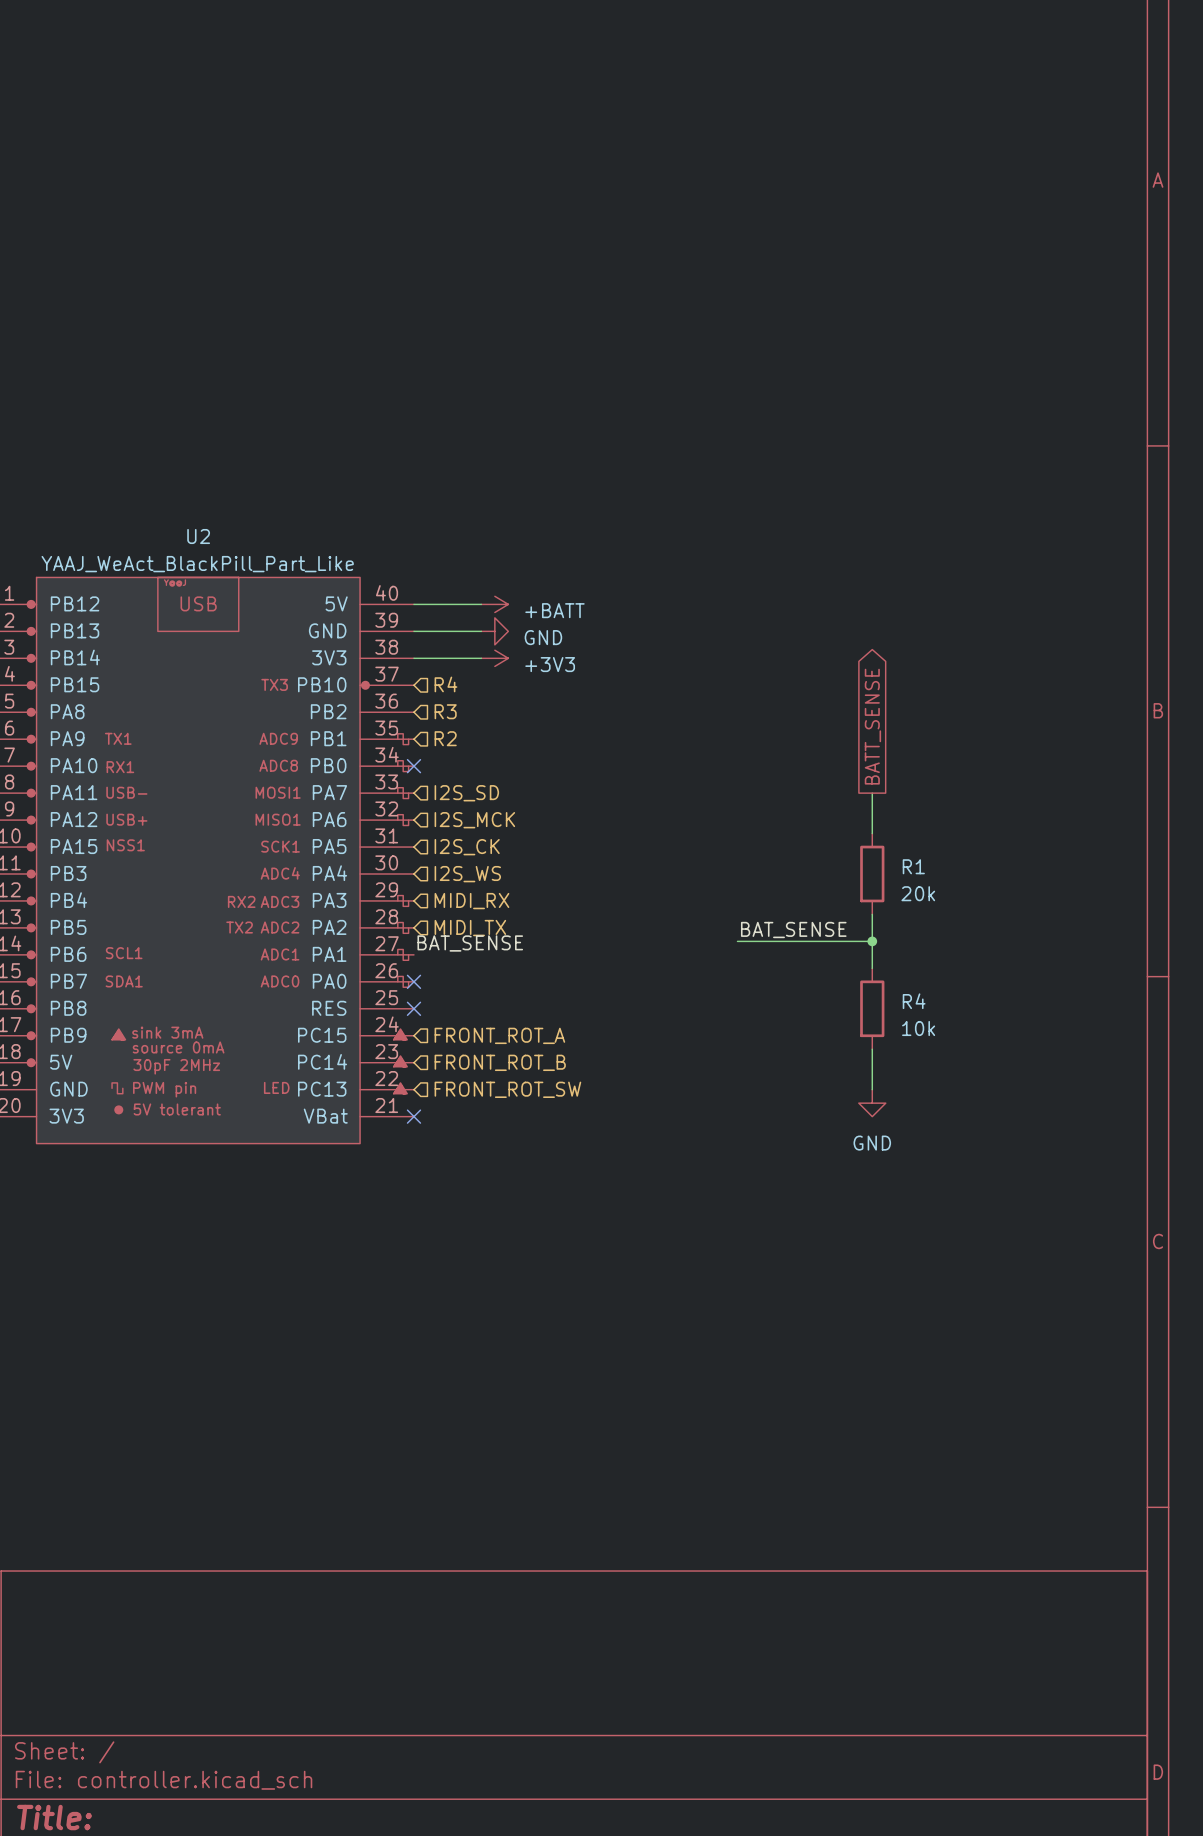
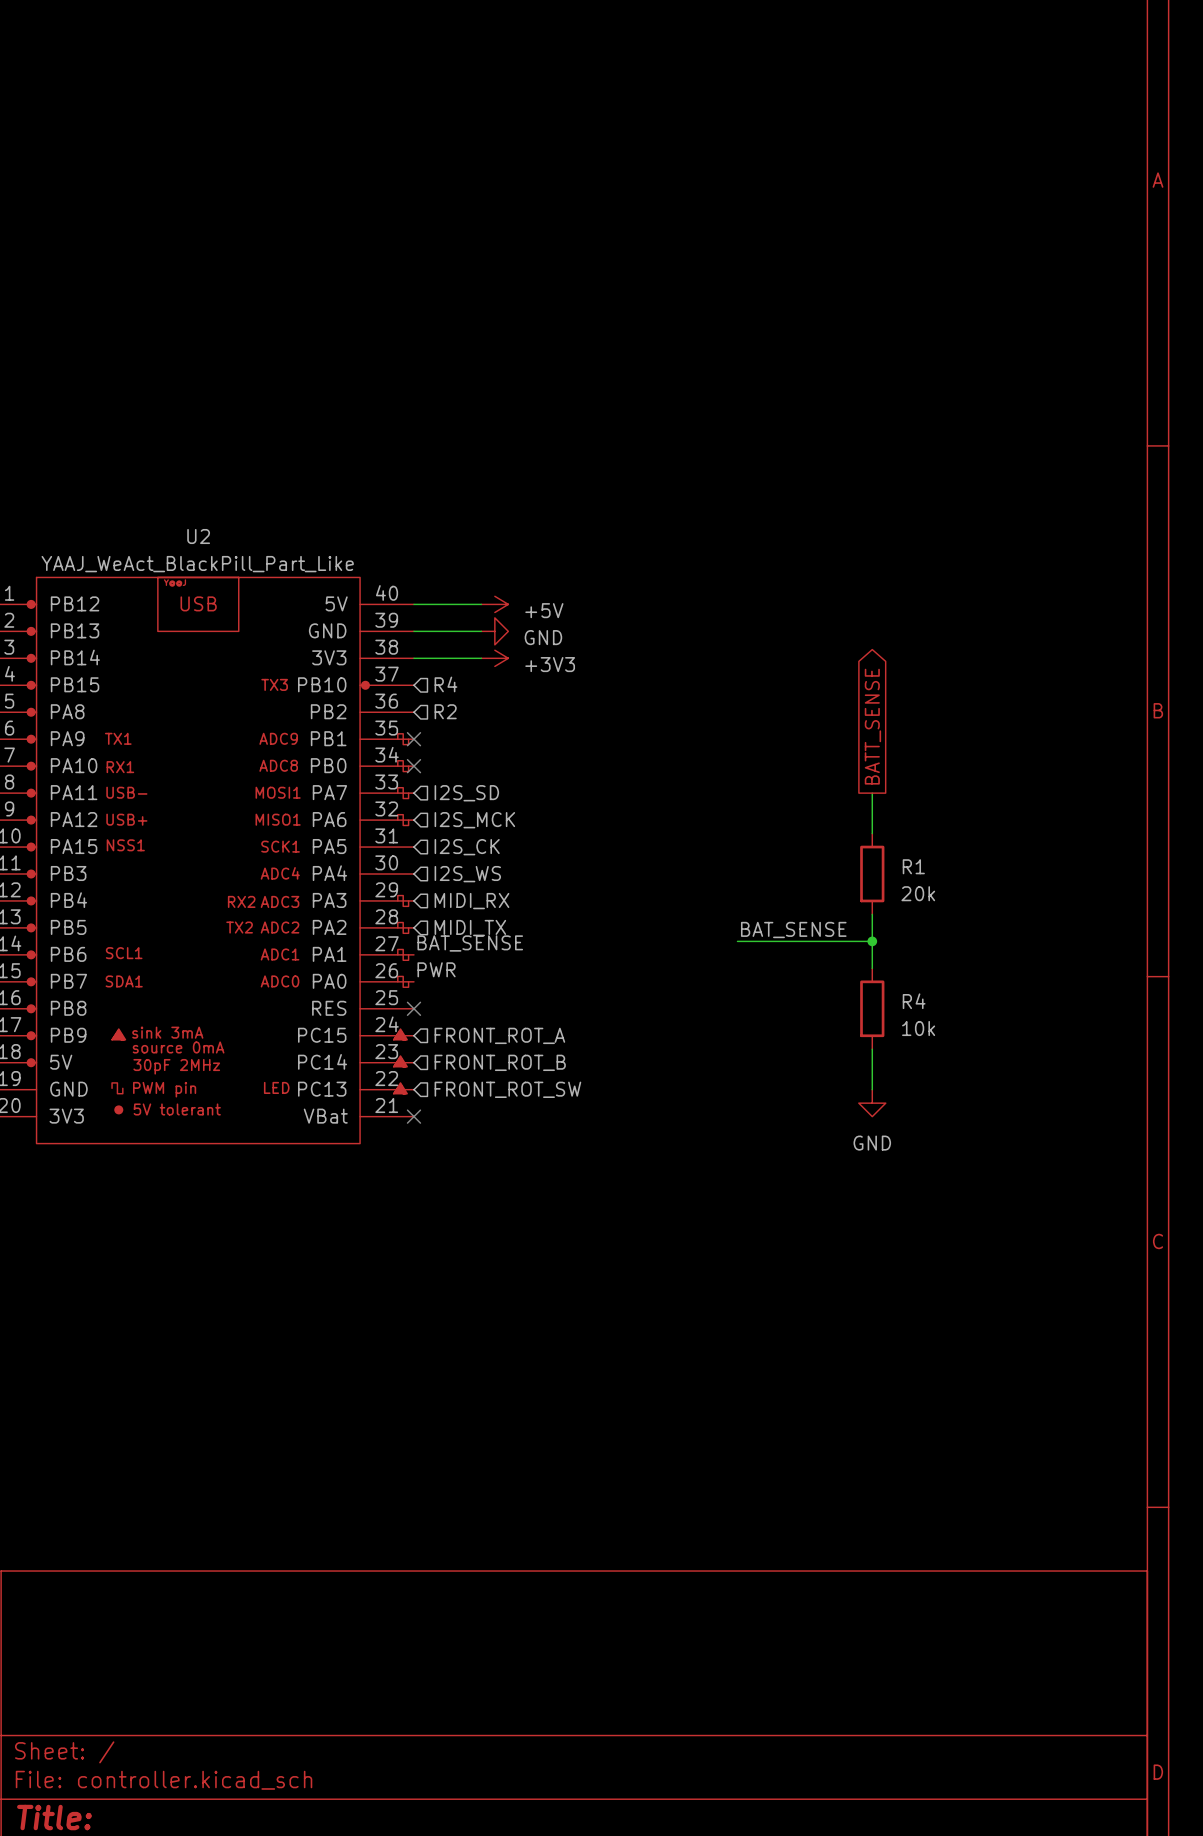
power symbol: +BATT (494, 604) -> +5V (494, 604)
hierarchical label: R3 (445, 711) -> R2 (445, 711)
hierarchical label: R2 (445, 738) -> none
no-connect mark: none -> (413, 739)
label: none -> PWR (436, 969)
no-connect mark: (413, 981) -> none

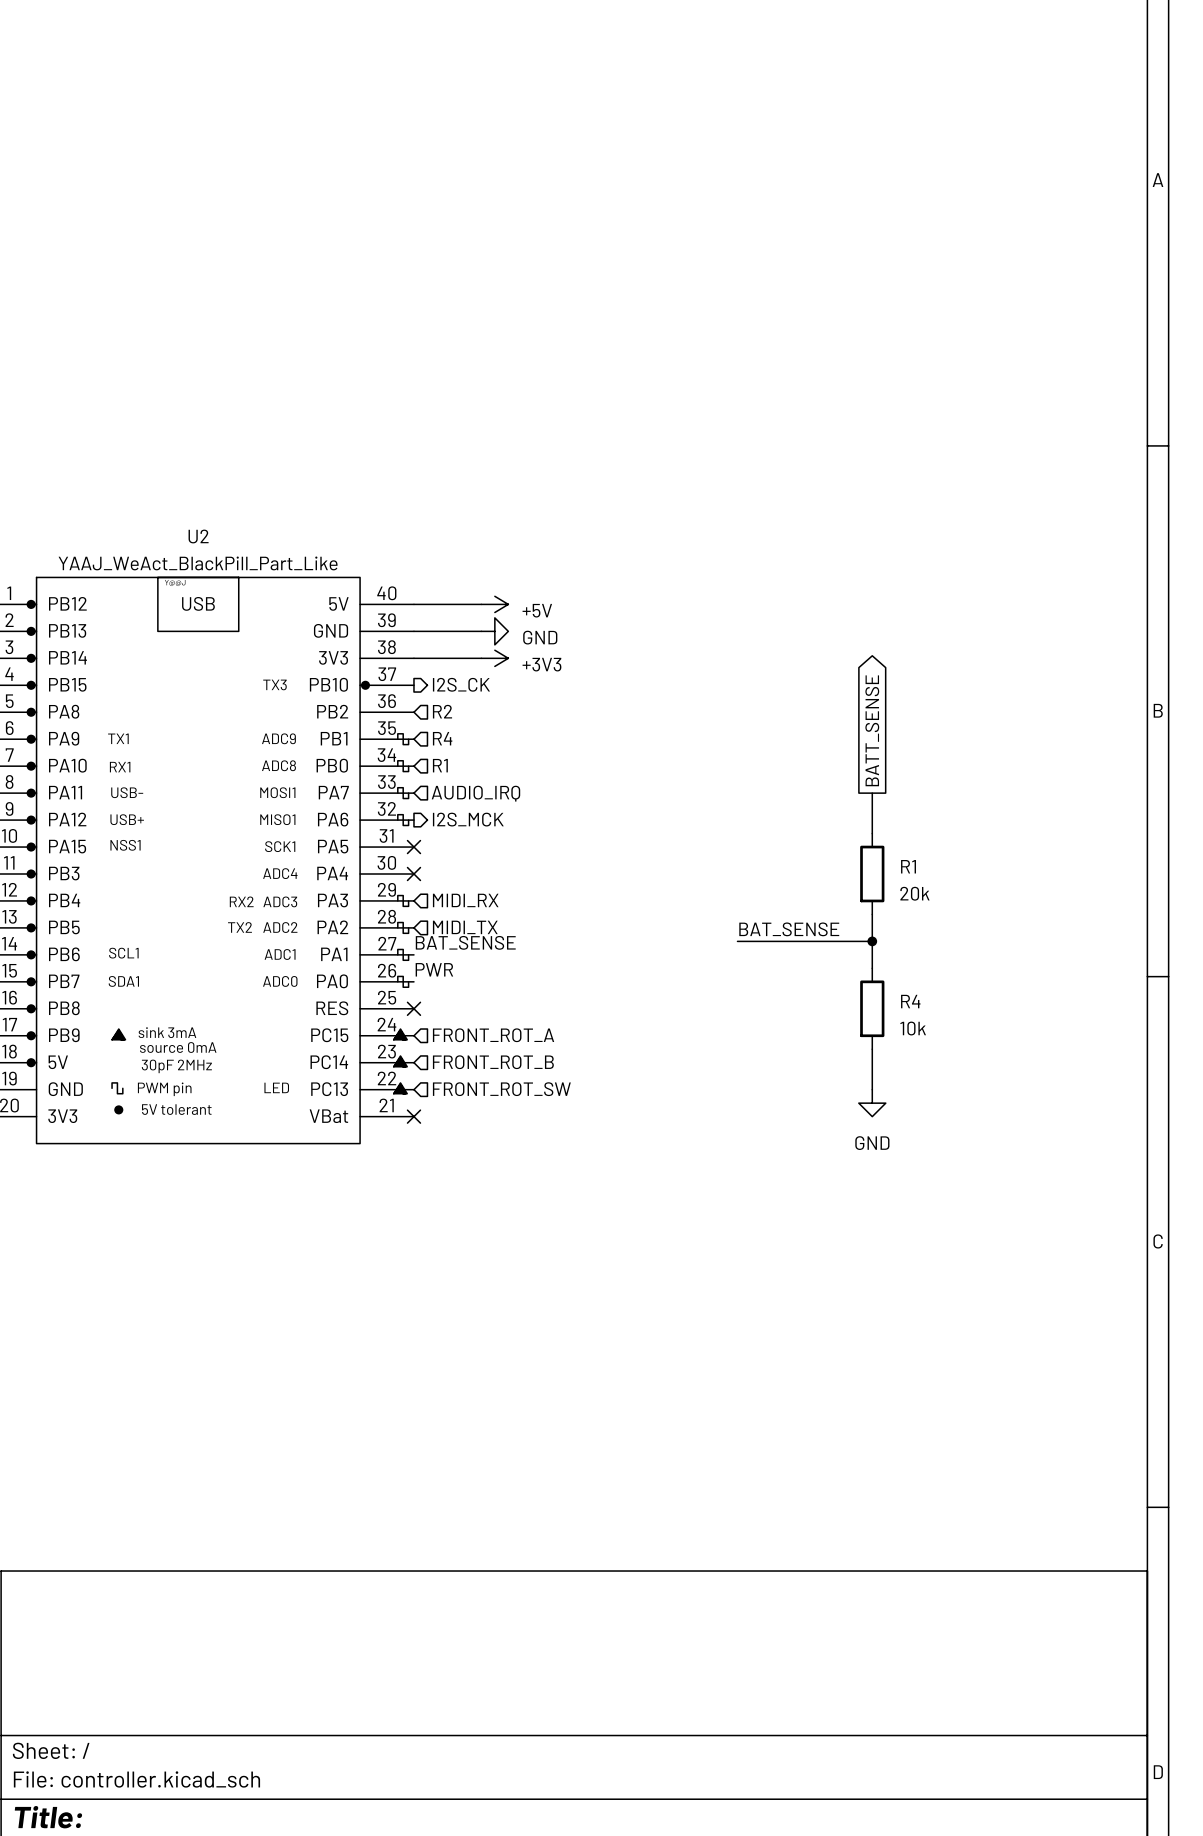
hierarchical label shape: input (445, 684) -> output (461, 684)
hierarchical label: R4 (445, 684) -> I2S_CK (461, 684)
hierarchical label: none -> R4 (442, 738)
no-connect mark: (413, 739) -> none
hierarchical label: none -> R1 (440, 765)
no-connect mark: (413, 766) -> none
hierarchical label: I2S_SD (466, 793) -> AUDIO_IRQ (475, 793)
hierarchical label shape: input (474, 820) -> output (468, 819)
no-connect mark: none -> (413, 847)
hierarchical label: I2S_CK (467, 847) -> none
no-connect mark: none -> (413, 874)
hierarchical label: I2S_WS (467, 874) -> none

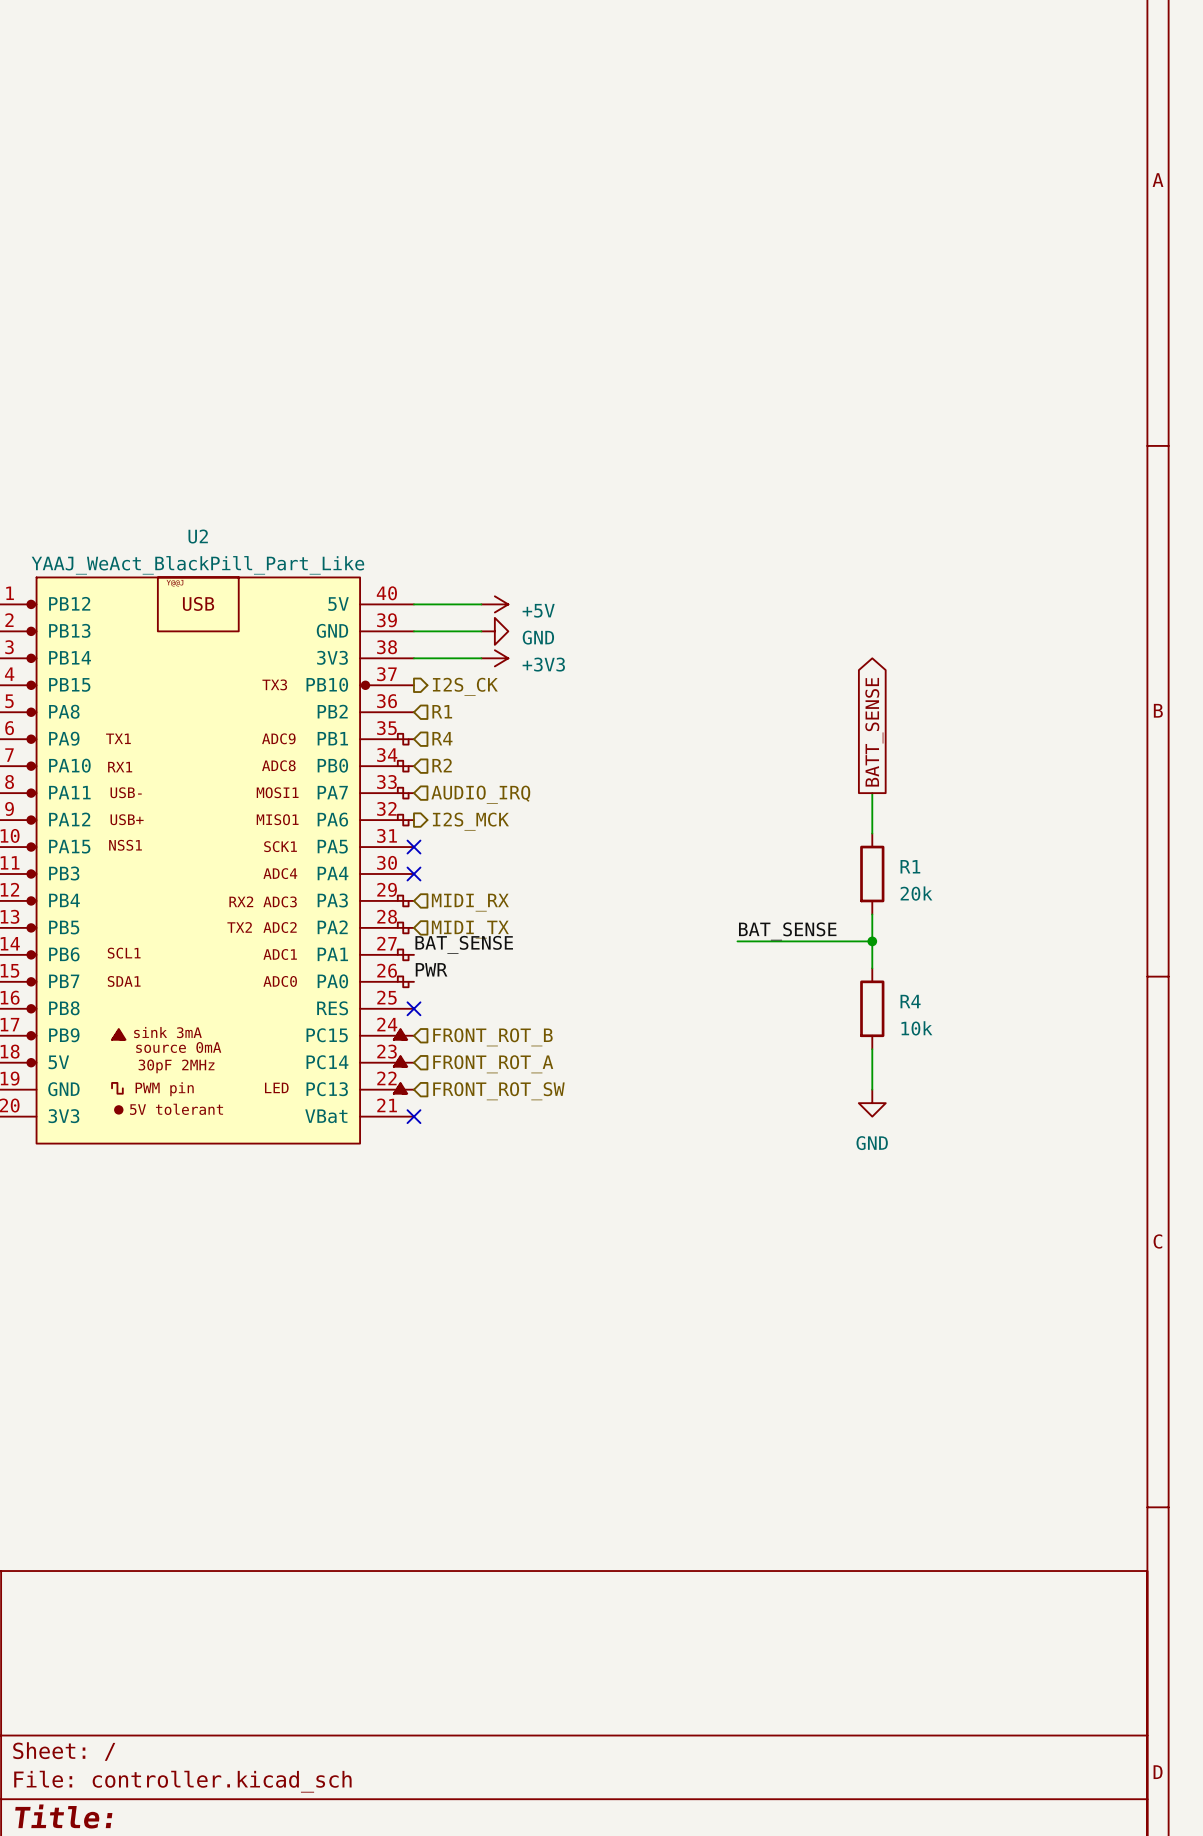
hierarchical label: R2 (442, 711) -> R1 (442, 711)
hierarchical label: R1 (440, 765) -> R2 (442, 765)
hierarchical label: FRONT_ROT_A (493, 1035) -> FRONT_ROT_B (492, 1037)
hierarchical label: FRONT_ROT_B (493, 1062) -> FRONT_ROT_A (493, 1064)

